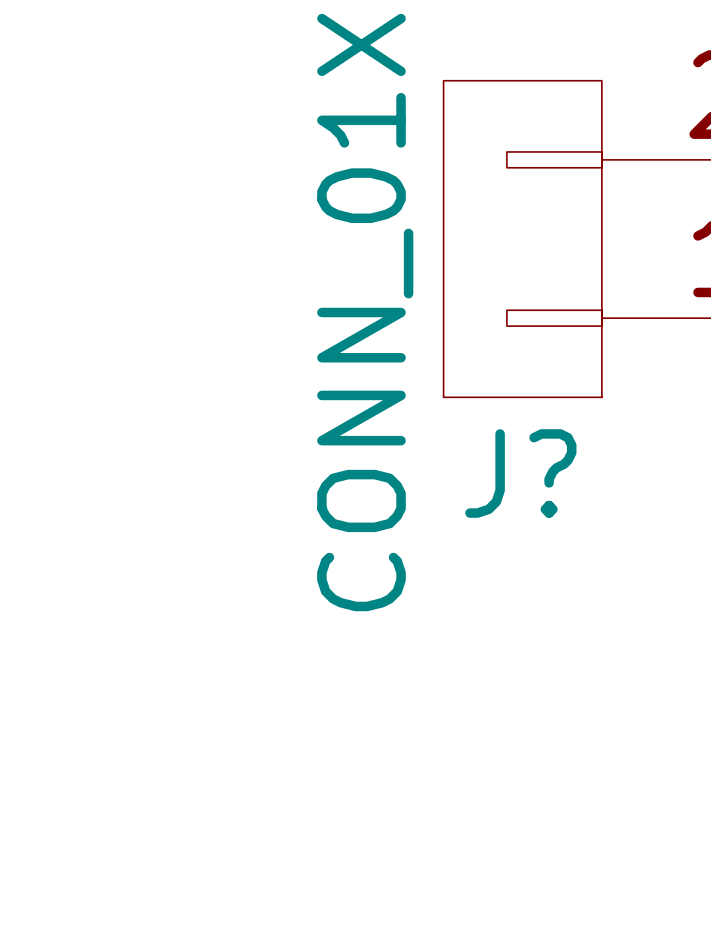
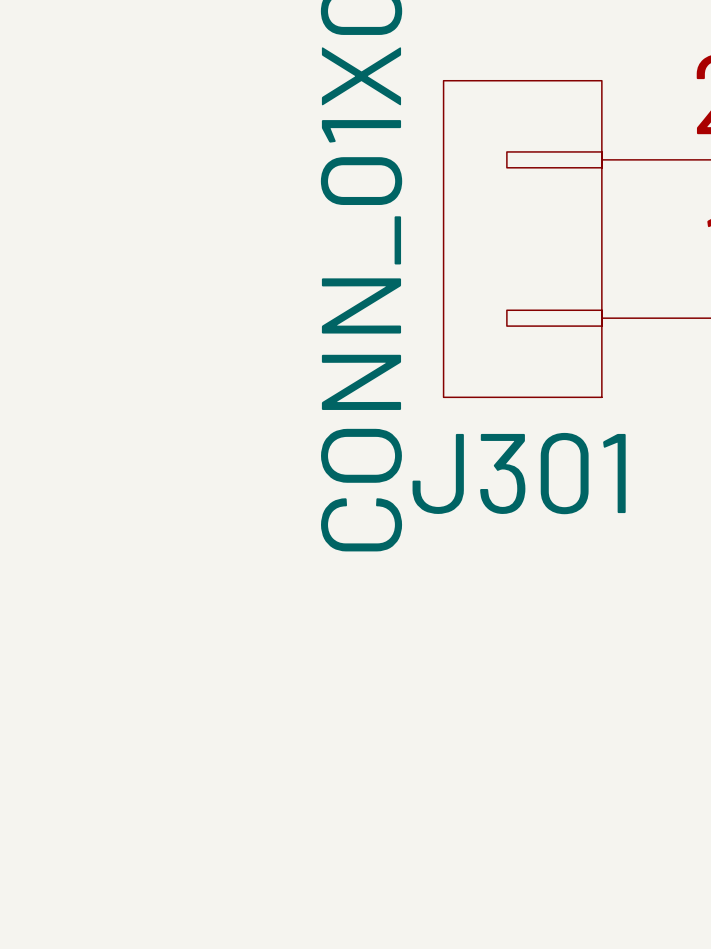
J? name: J? (520, 473) -> J301 (519, 473)

